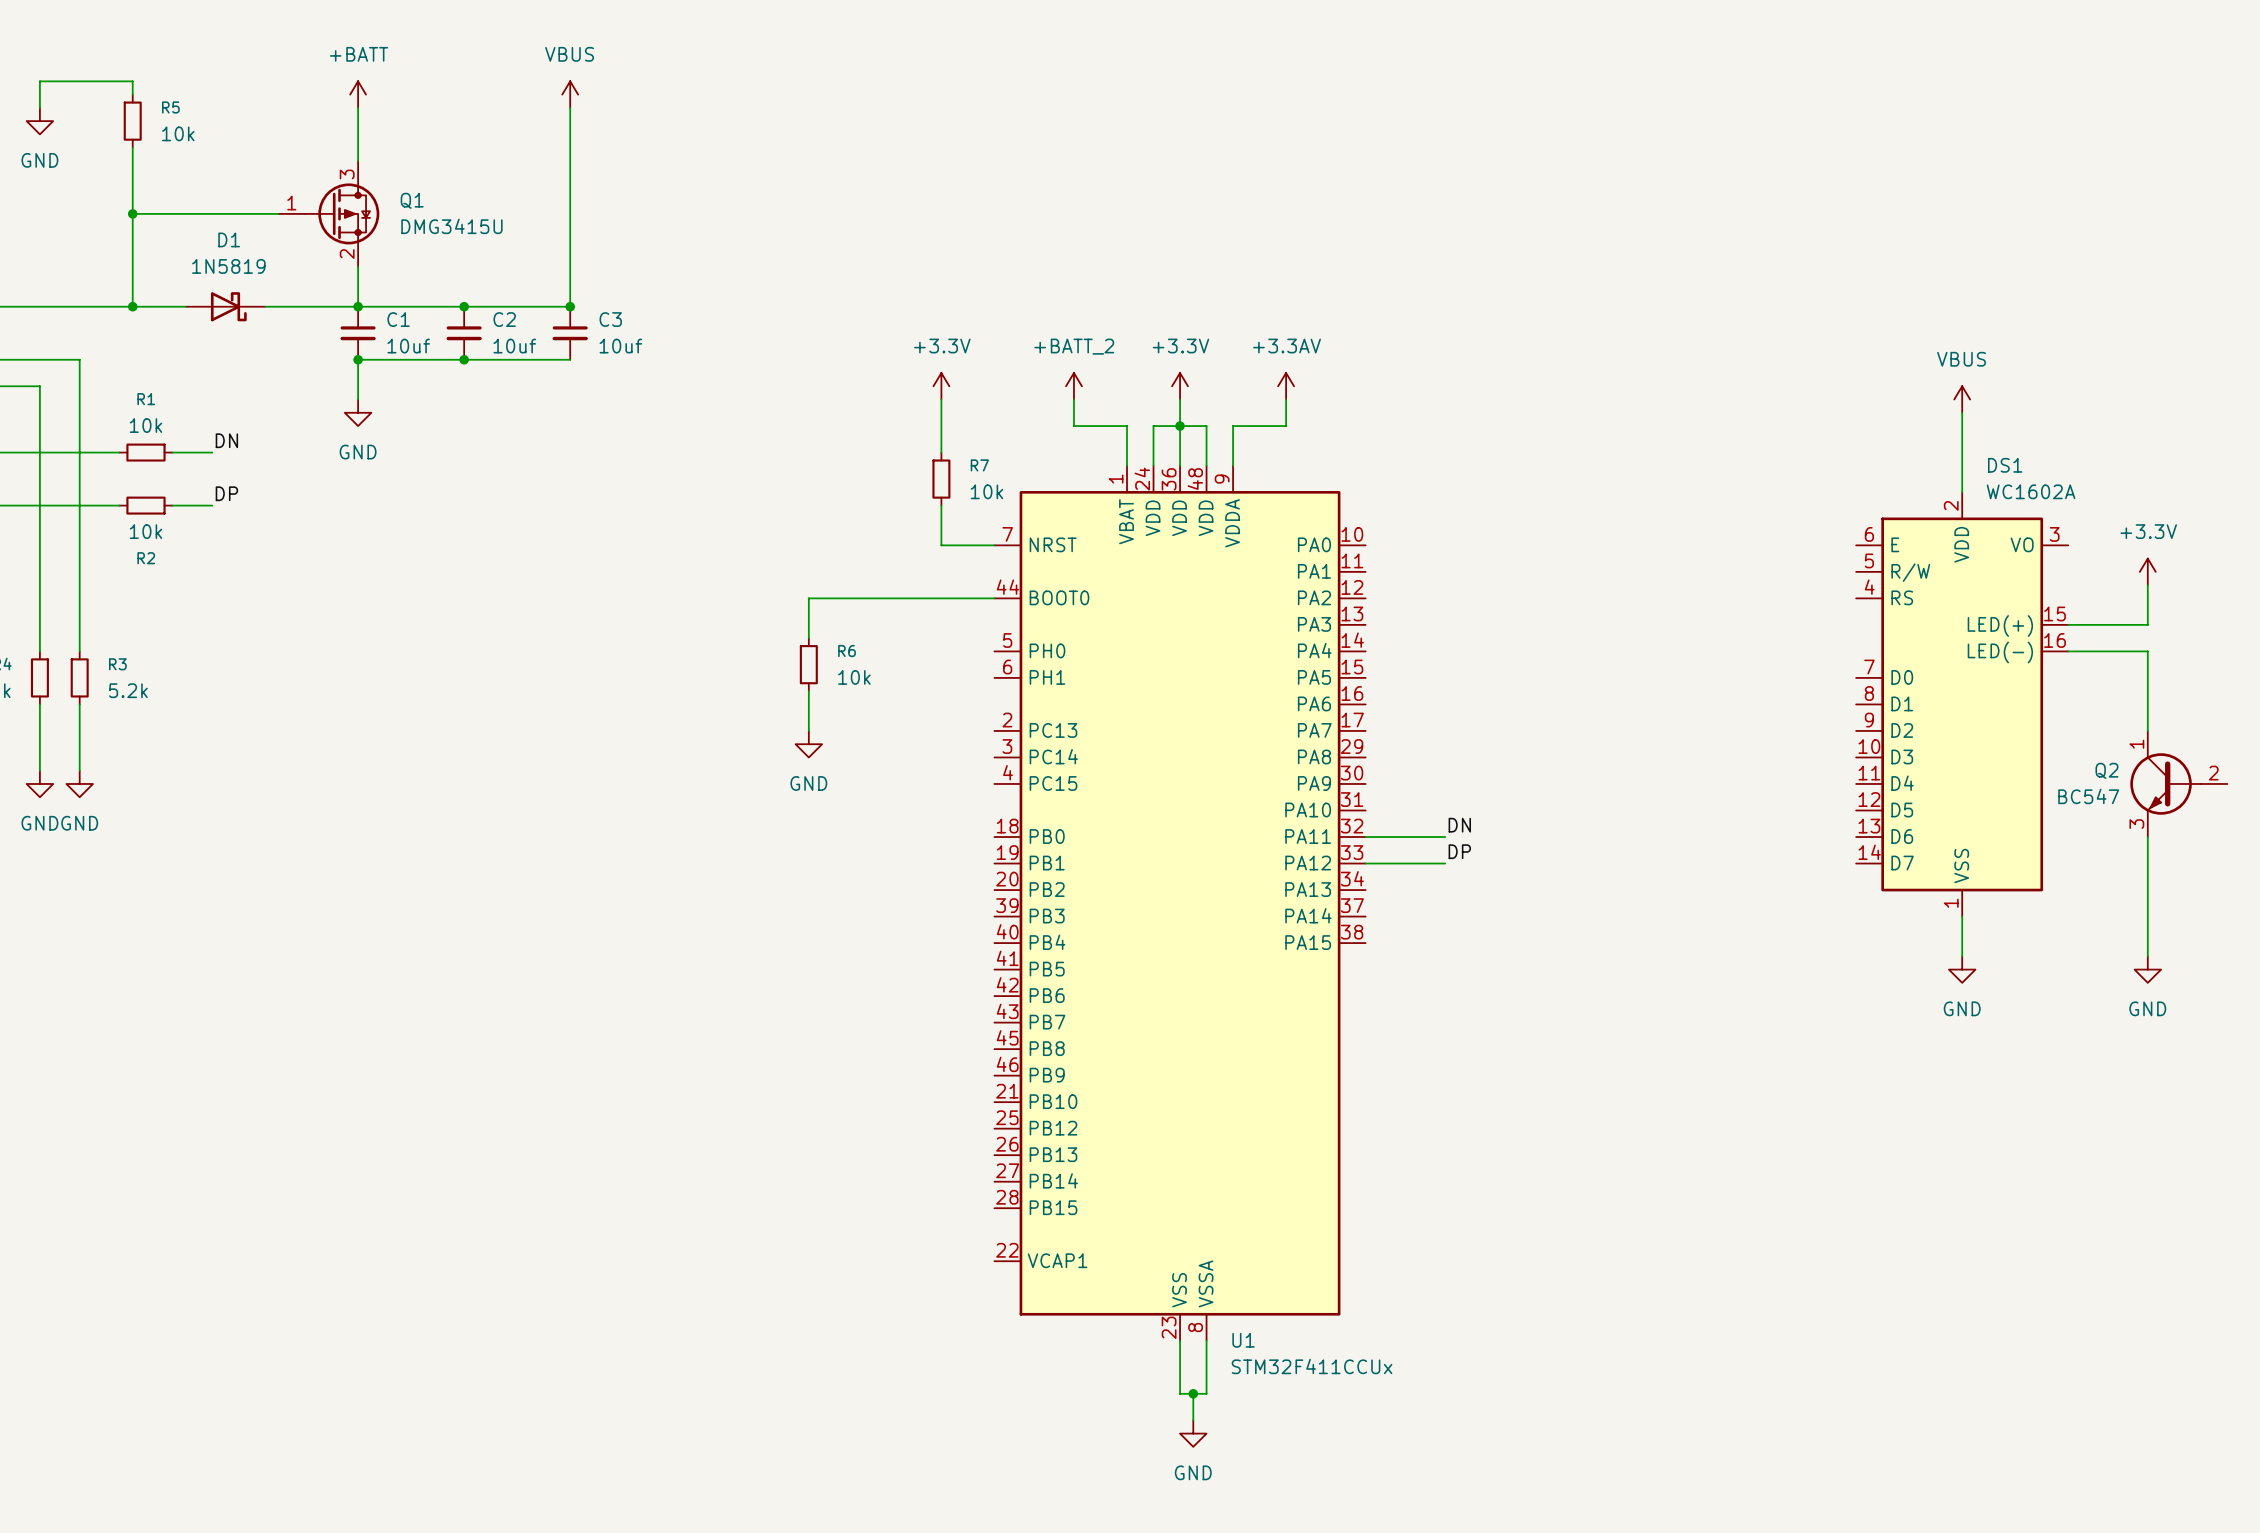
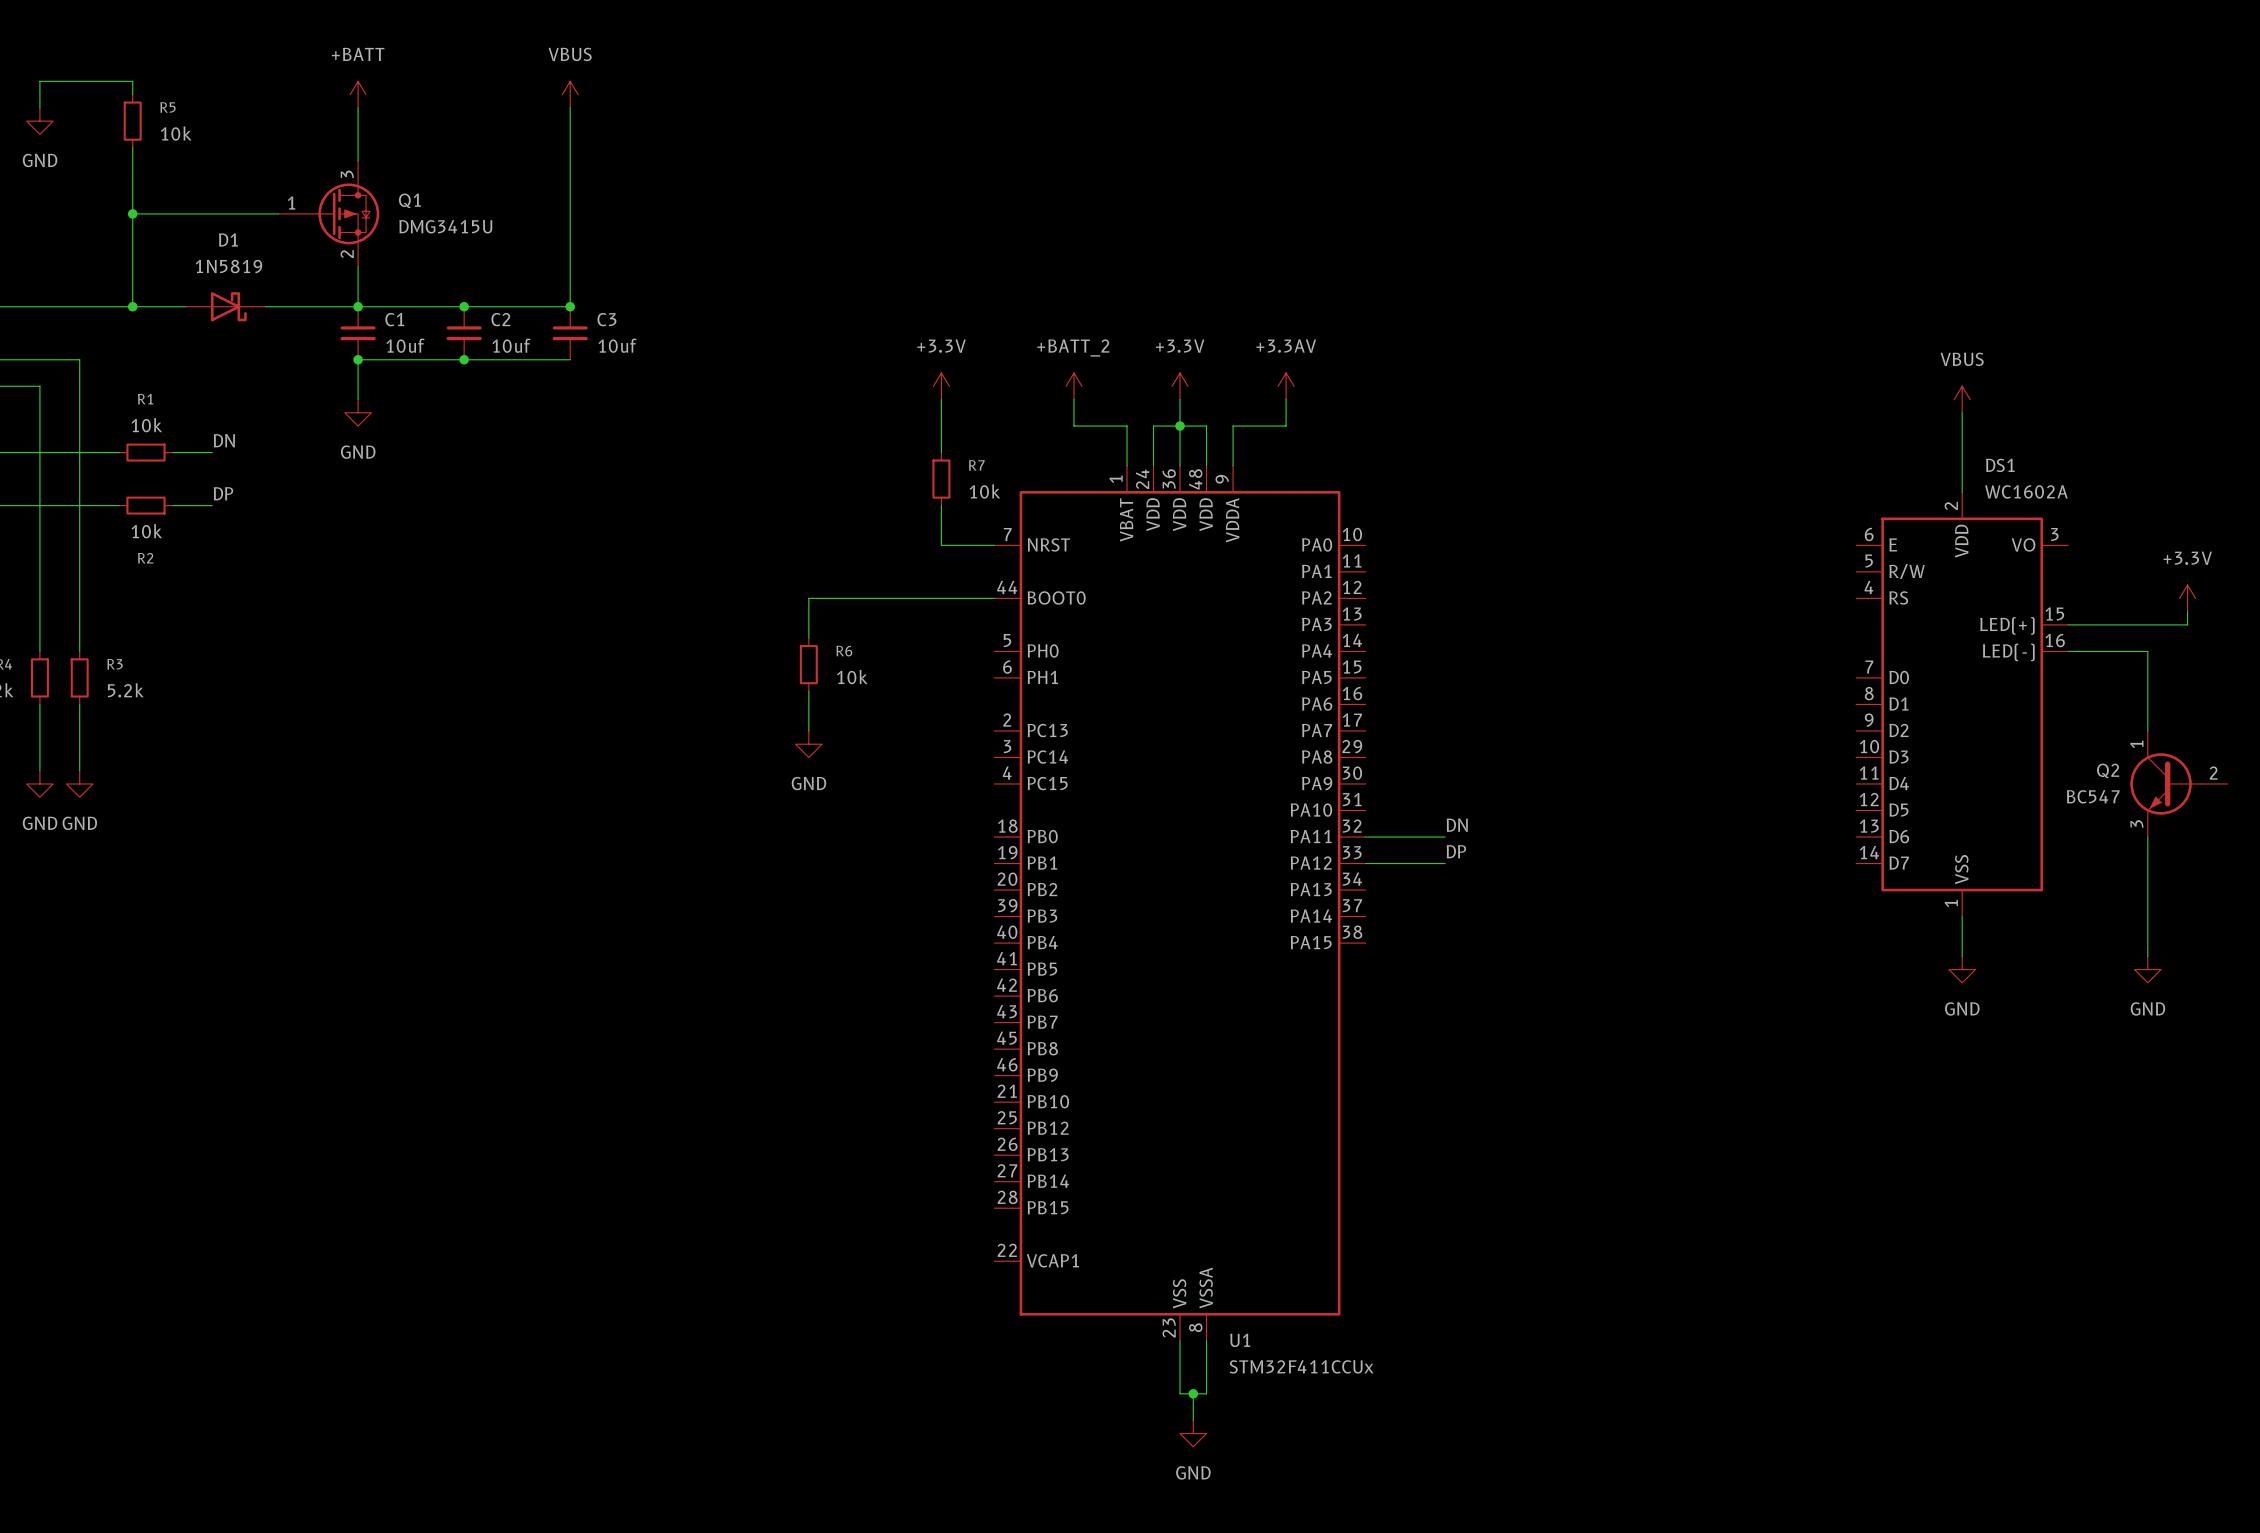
power symbol position: +3.3V (2147, 571) -> +3.3V (2187, 598)
wire: (2147, 585) (2147, 624) -> (2187, 611) (2187, 624) (2147, 624)

